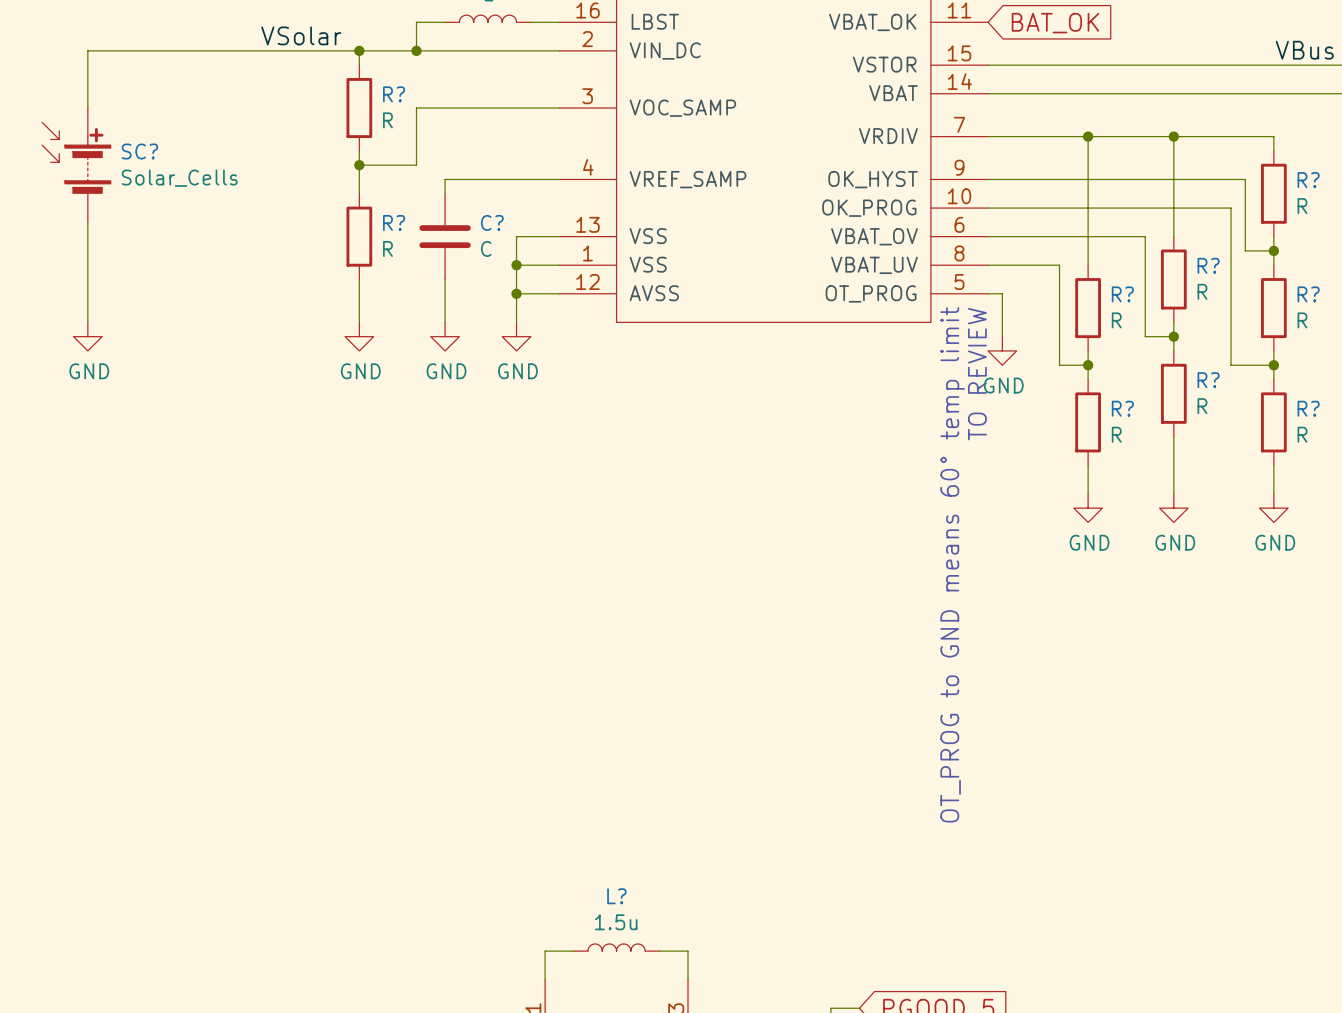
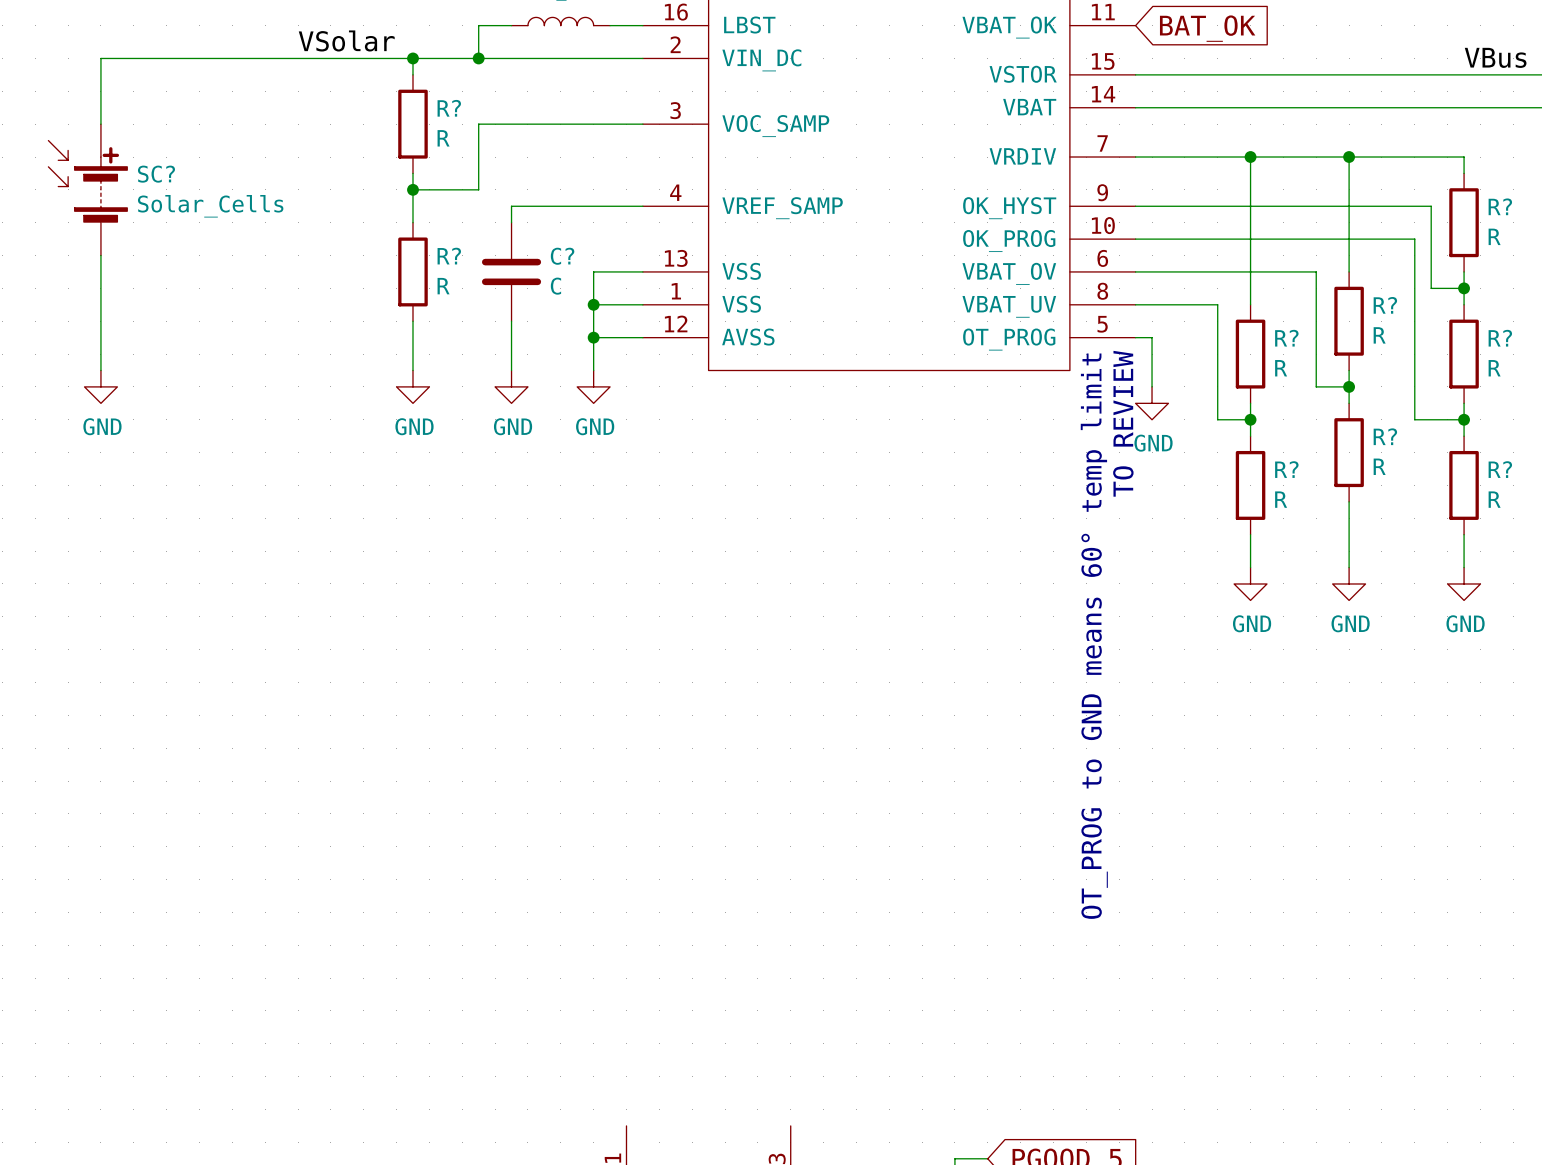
L?: 1.5u (616, 947) -> none
wire: (573, 951) (545, 951) (545, 979) -> none
wire: (659, 951) (688, 951) (688, 979) -> none

